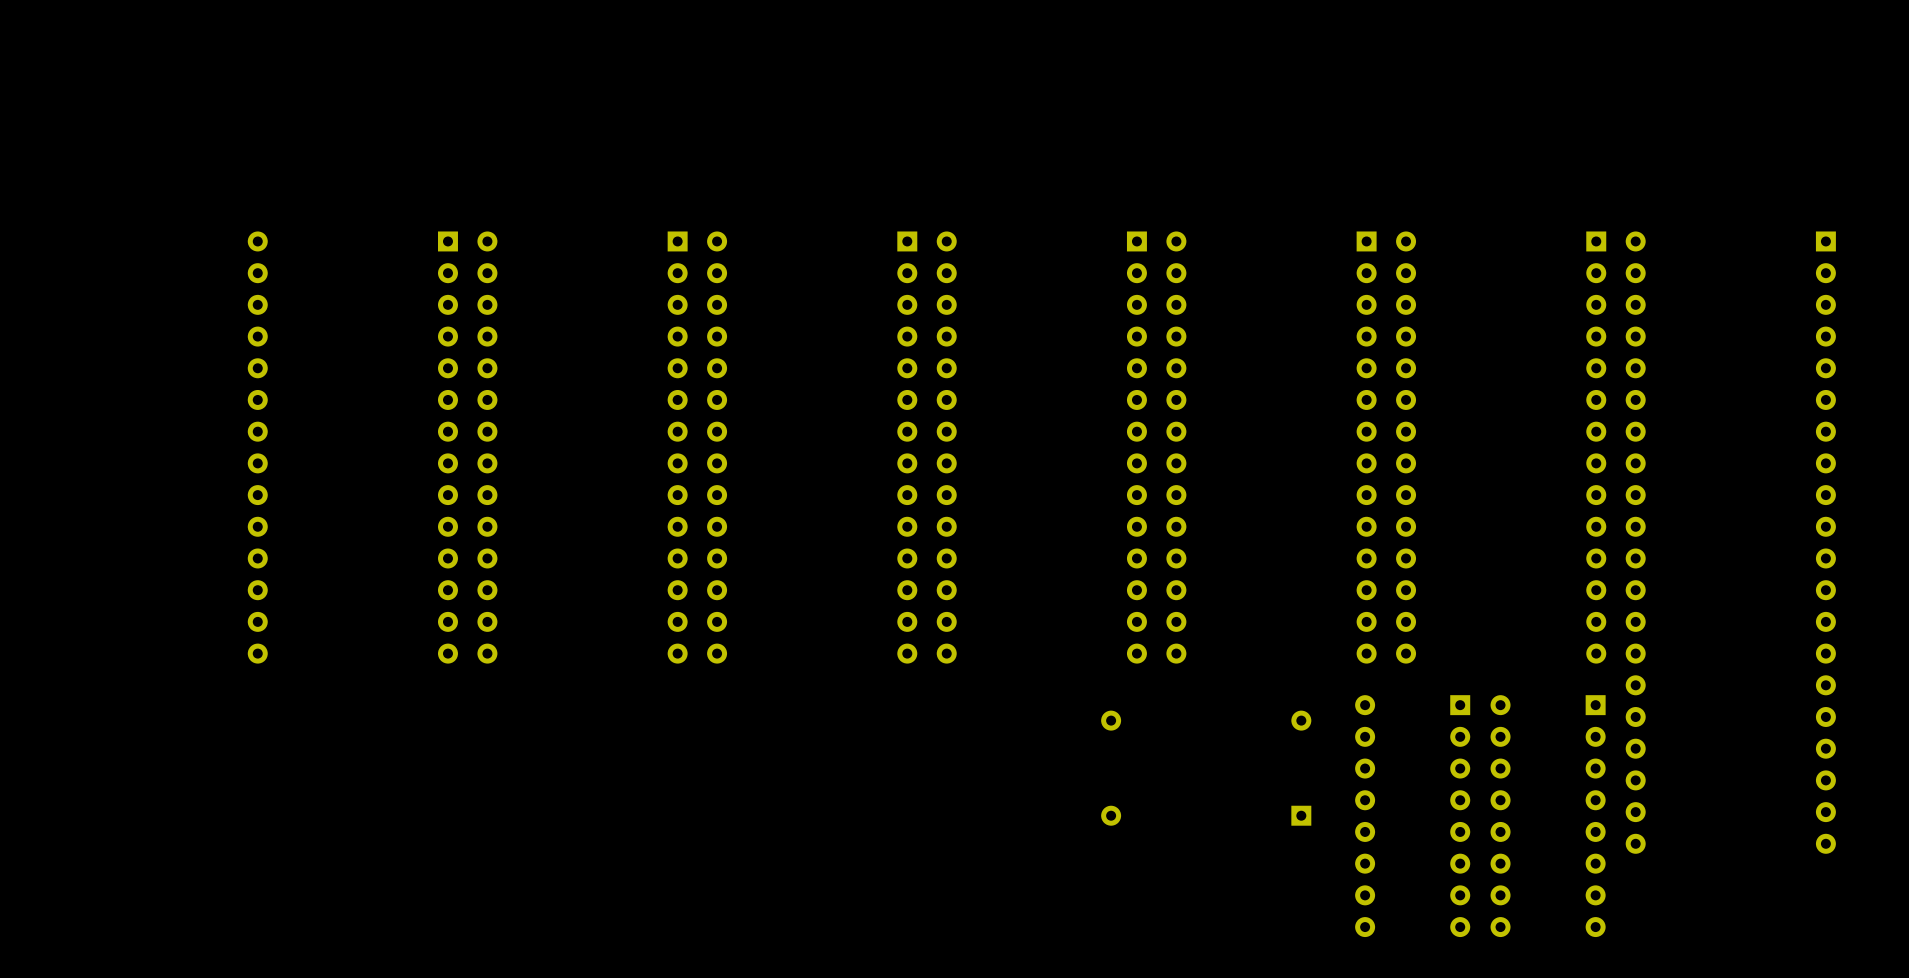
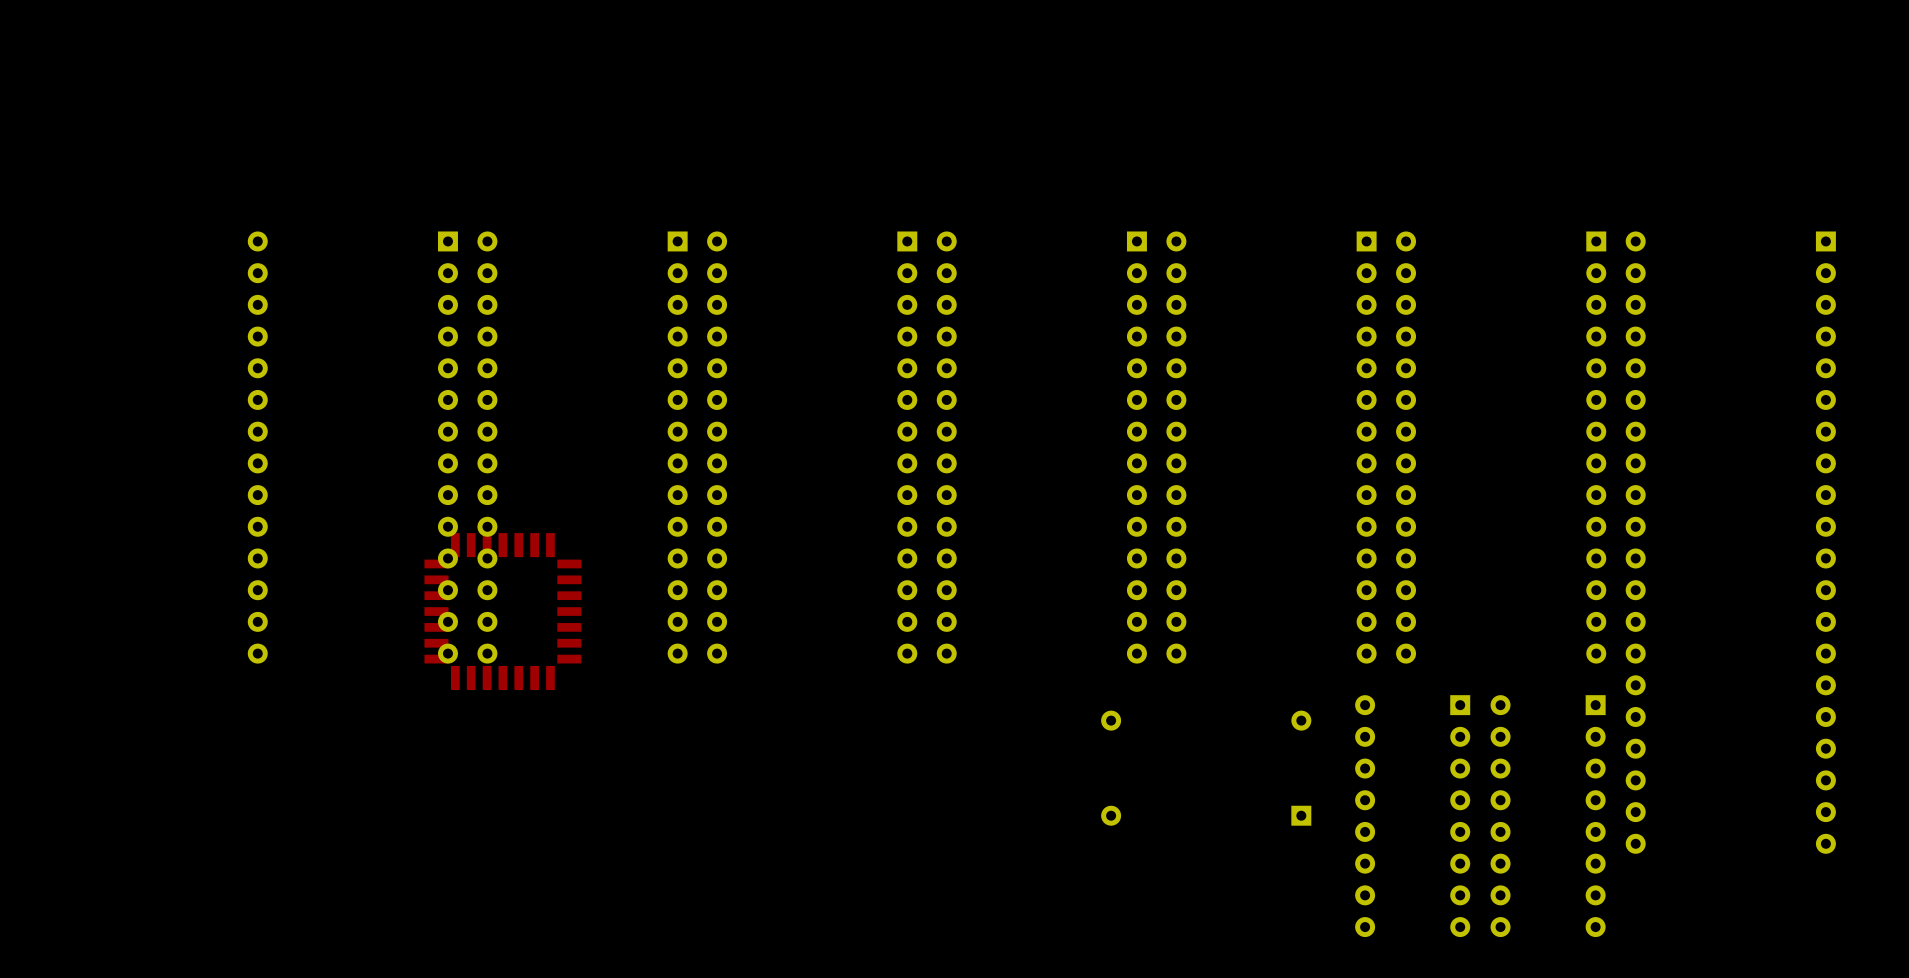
part: none -> (502, 611)

